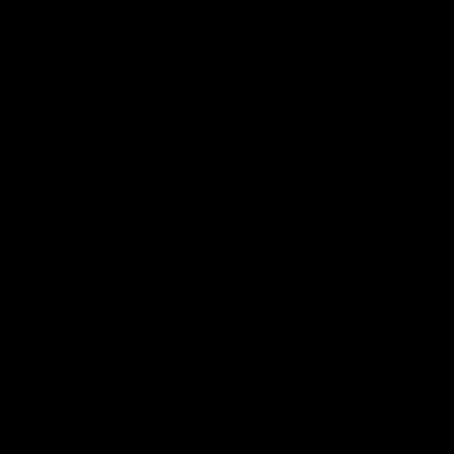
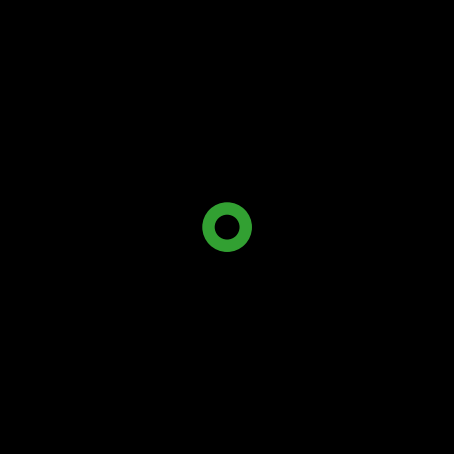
via: none -> (227, 227)

